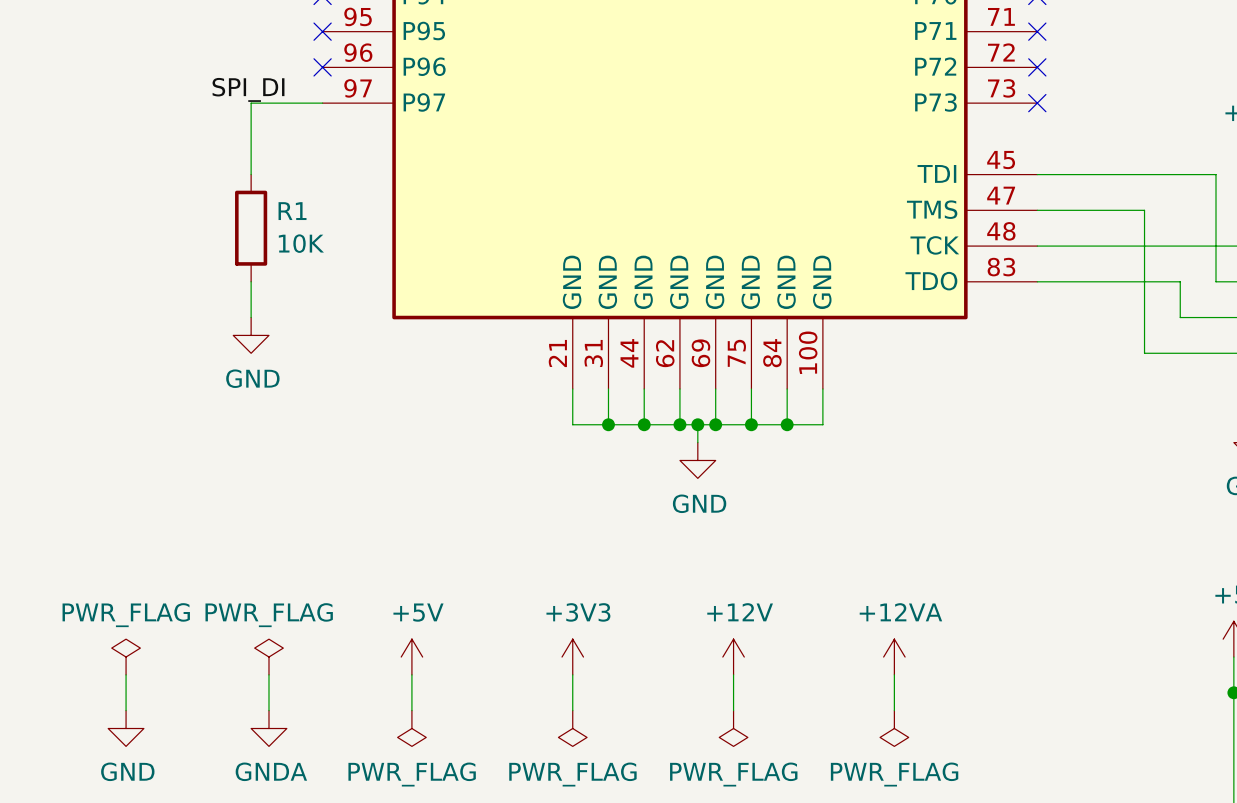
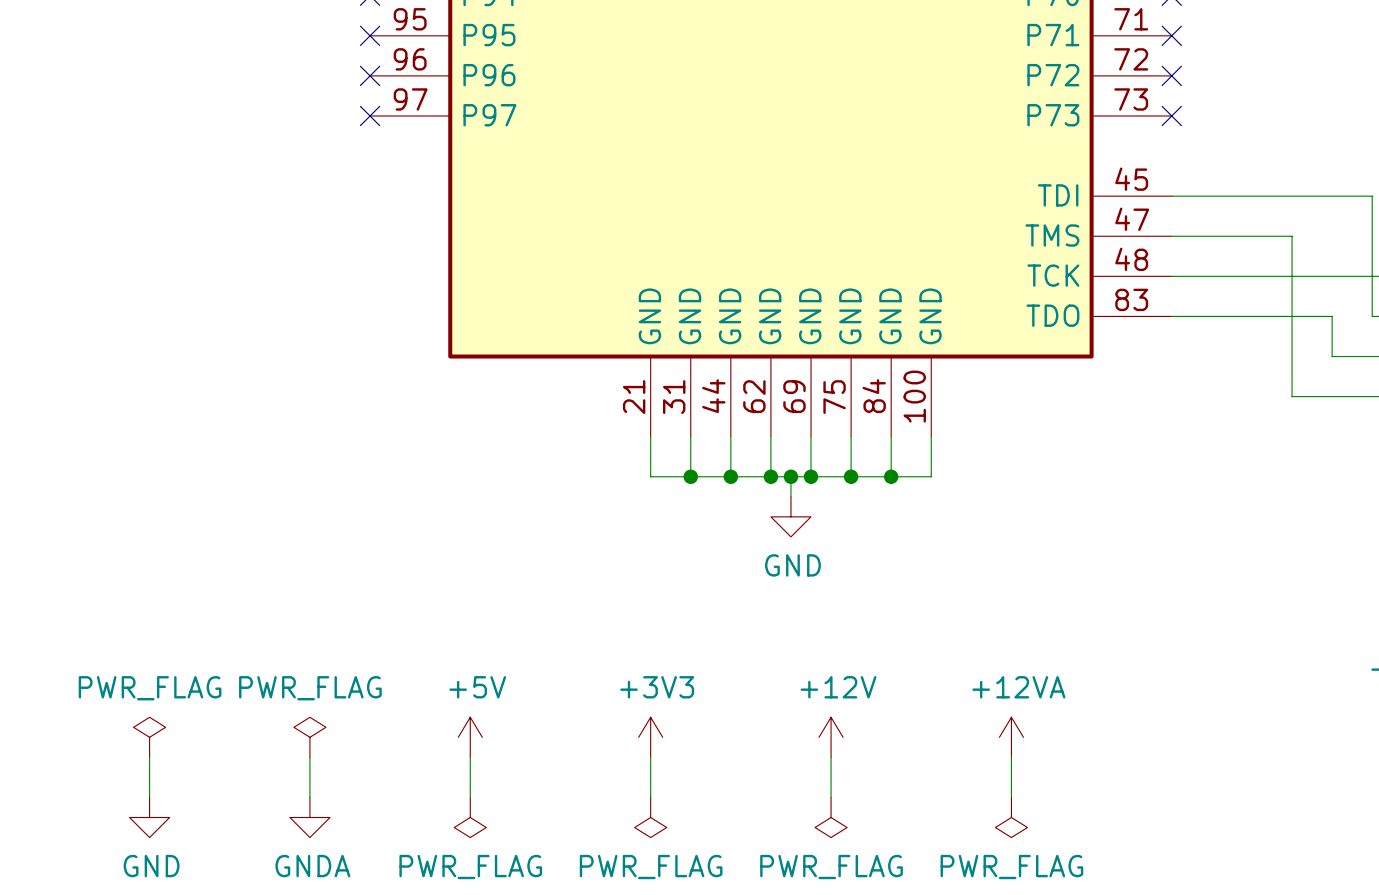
label: SPI_DI (248, 89) -> none
wire: (322, 103) (251, 103) (251, 174) -> none
no-connect mark: none -> (370, 116)
R1: 10K (251, 228) -> none
wire: (251, 281) (251, 317) -> none
power symbol: GND (251, 335) -> none

